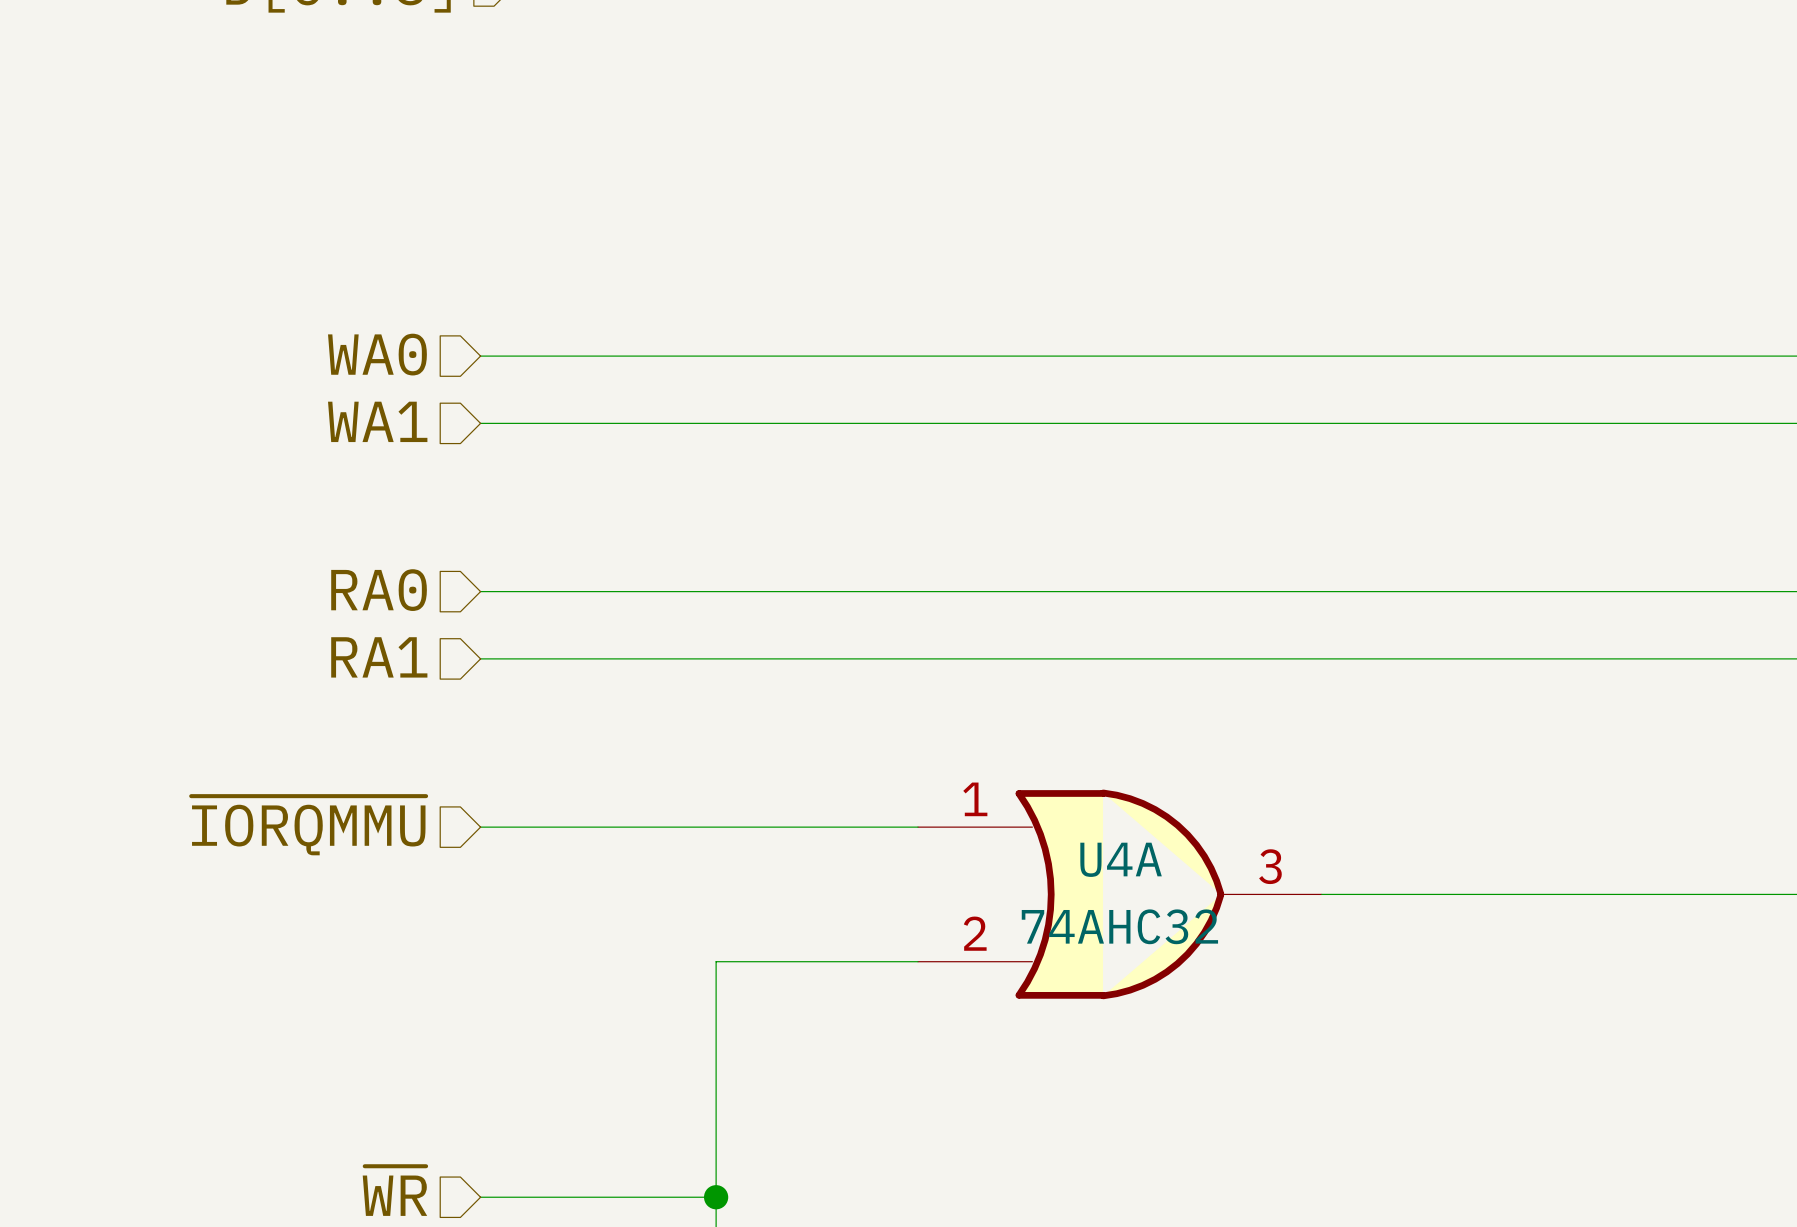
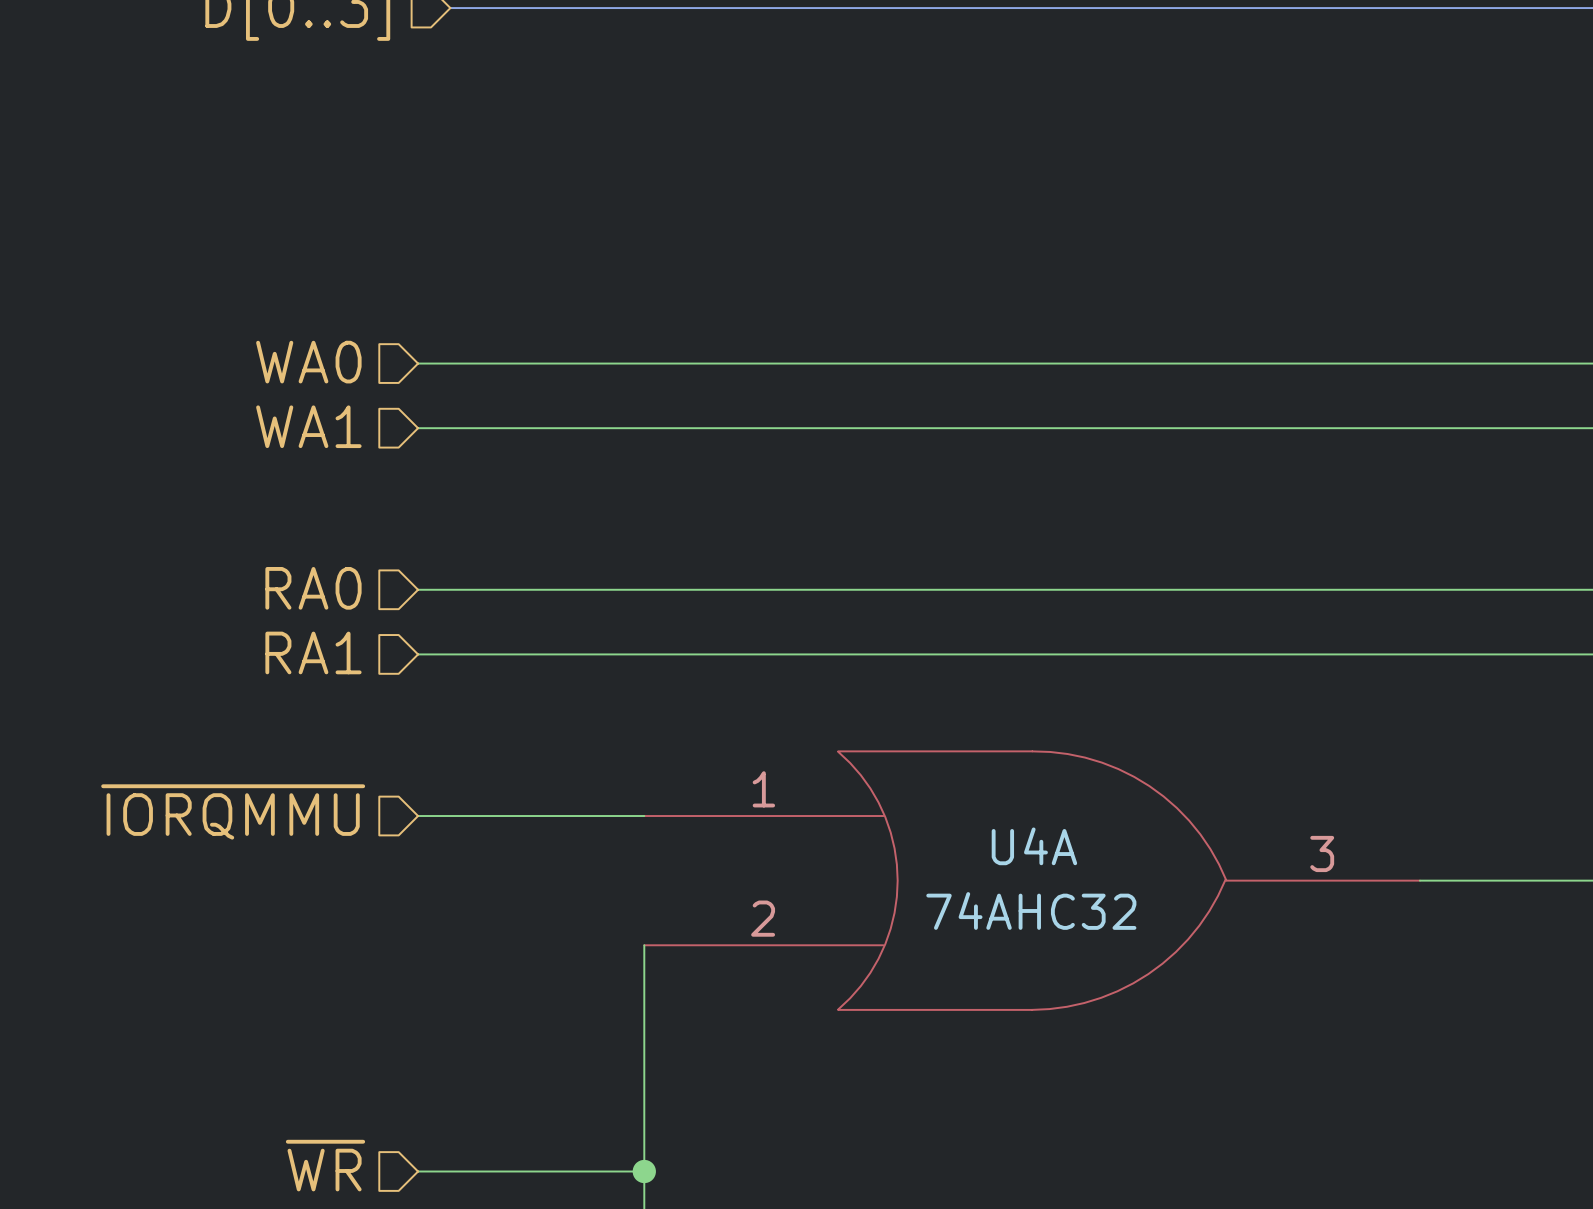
U4A symbol: [917, 789, 1322, 1000] -> [644, 751, 1420, 1010]

